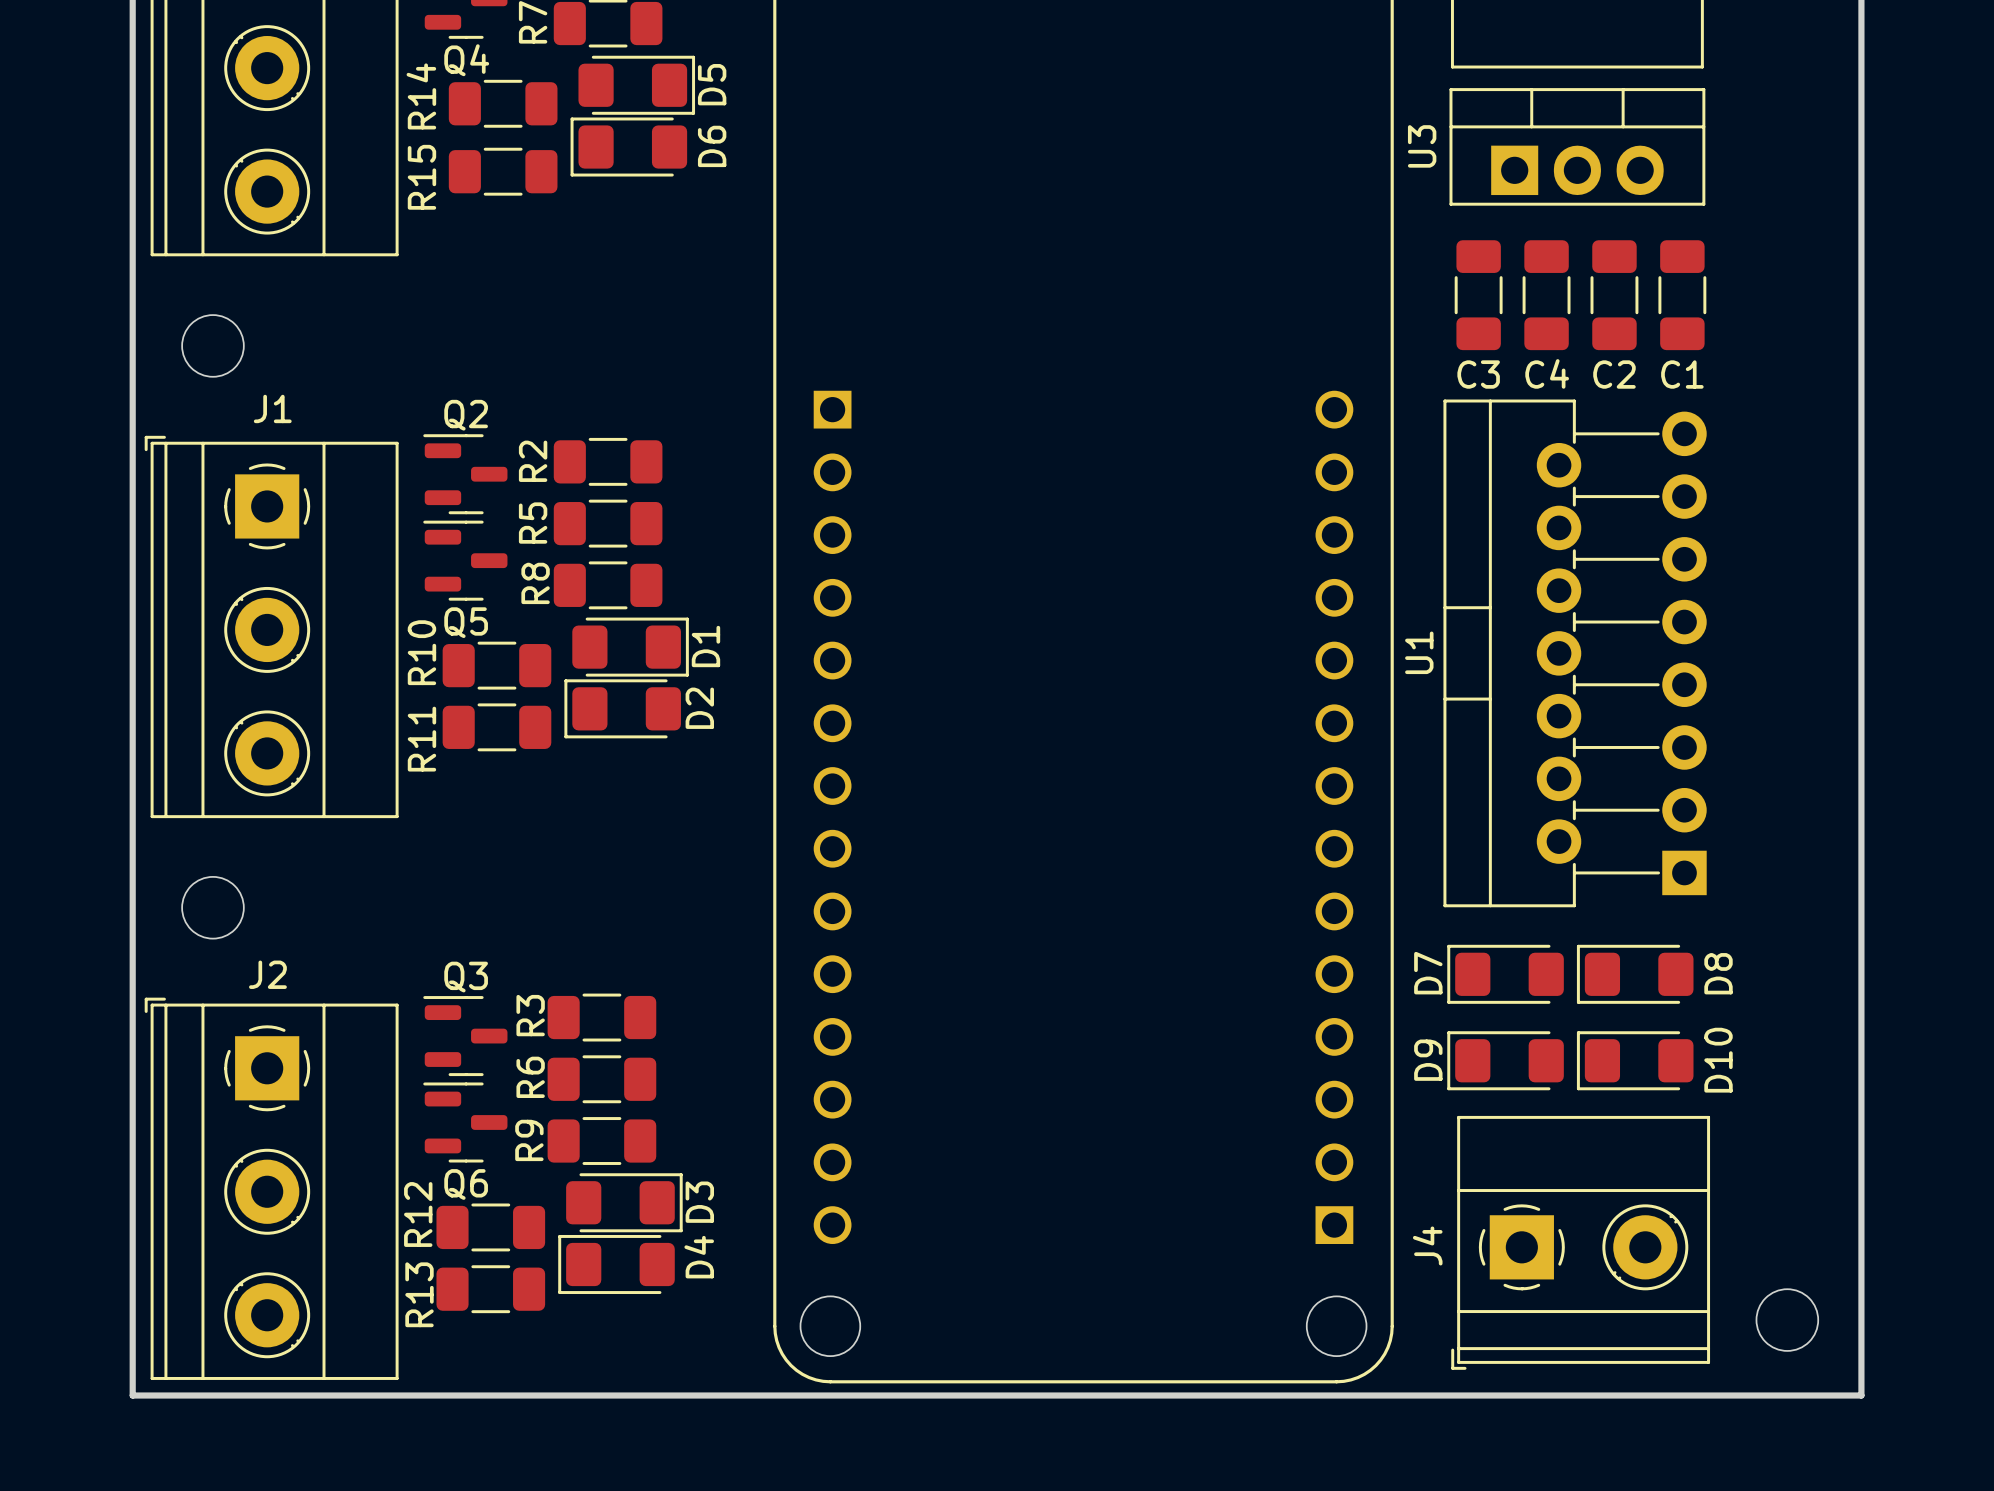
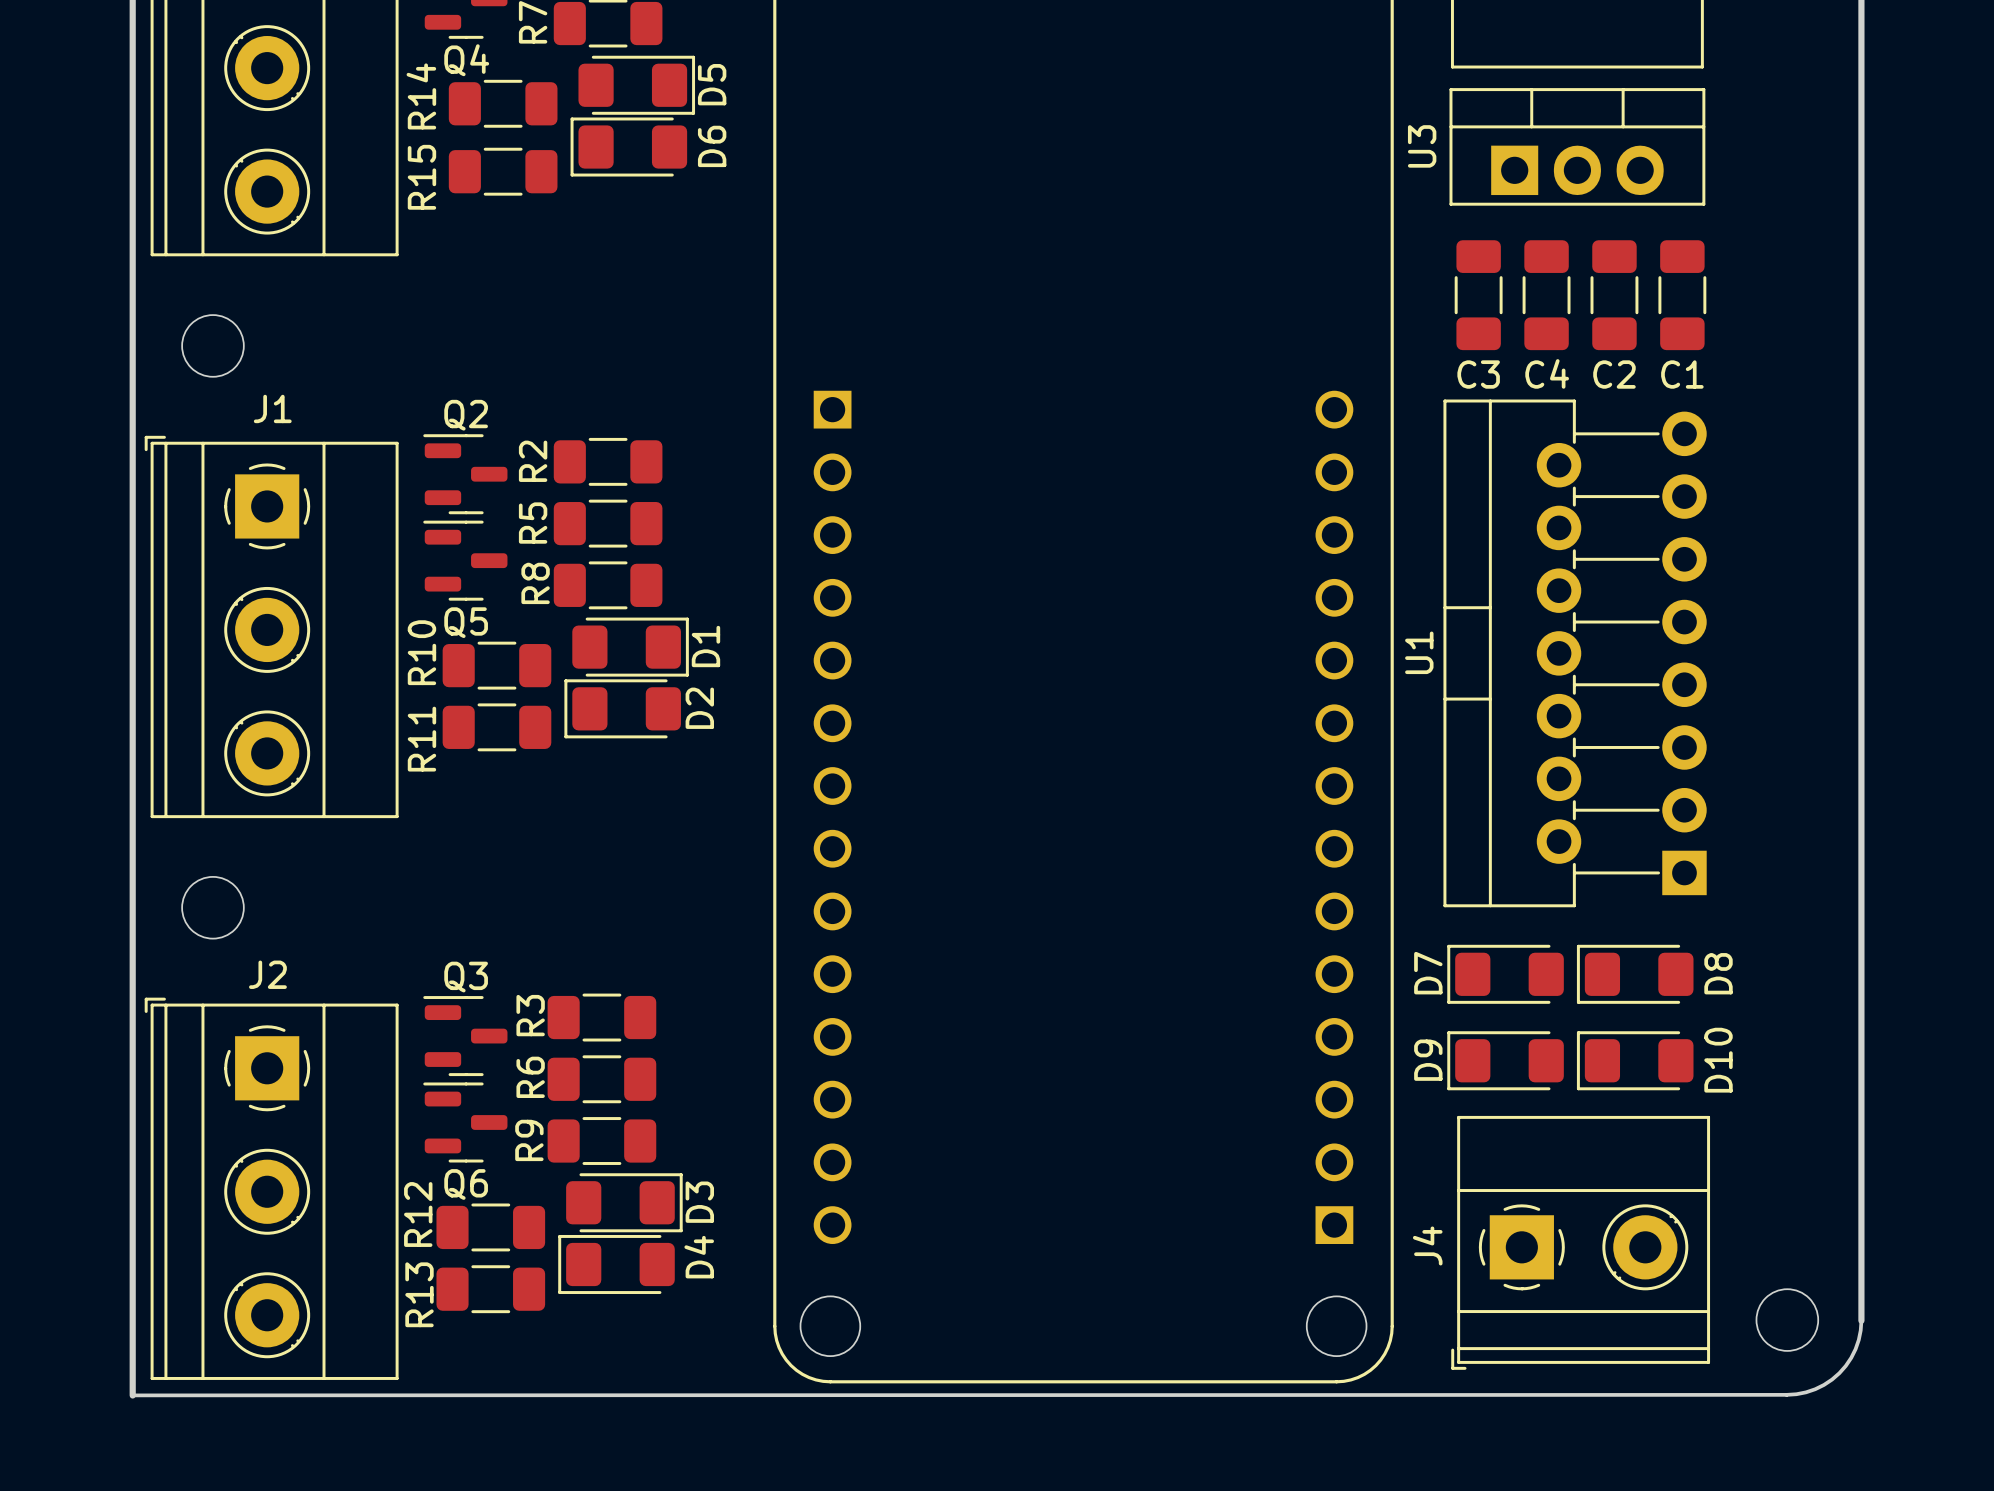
board edge: (1861, 1320) (1861, 1395) (132, 1395) -> (1861, 1320) (1855, 1349) (1839, 1373) (1815, 1389) (1786, 1394) (132, 1395)

